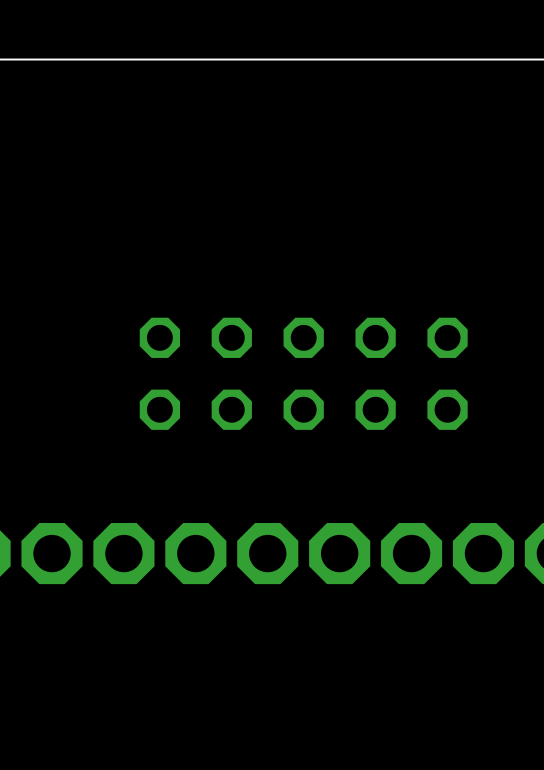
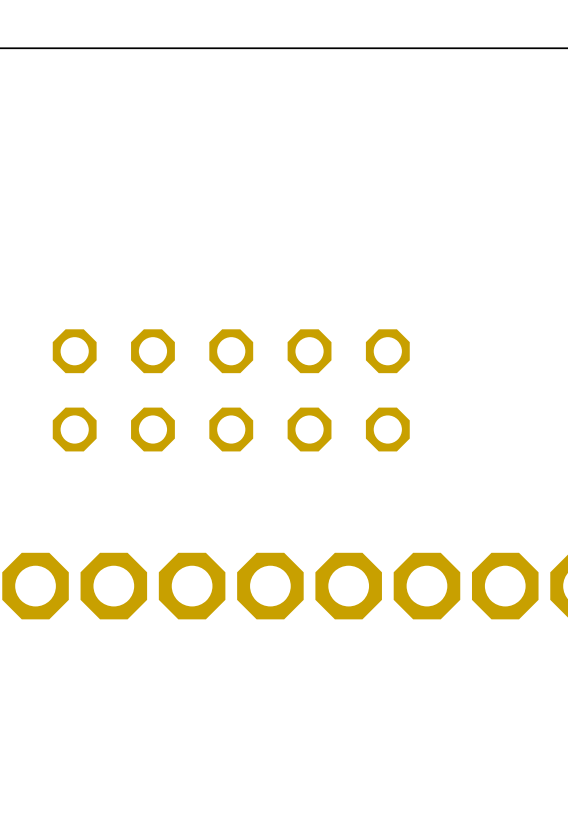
part position: (303, 373) -> (231, 390)

